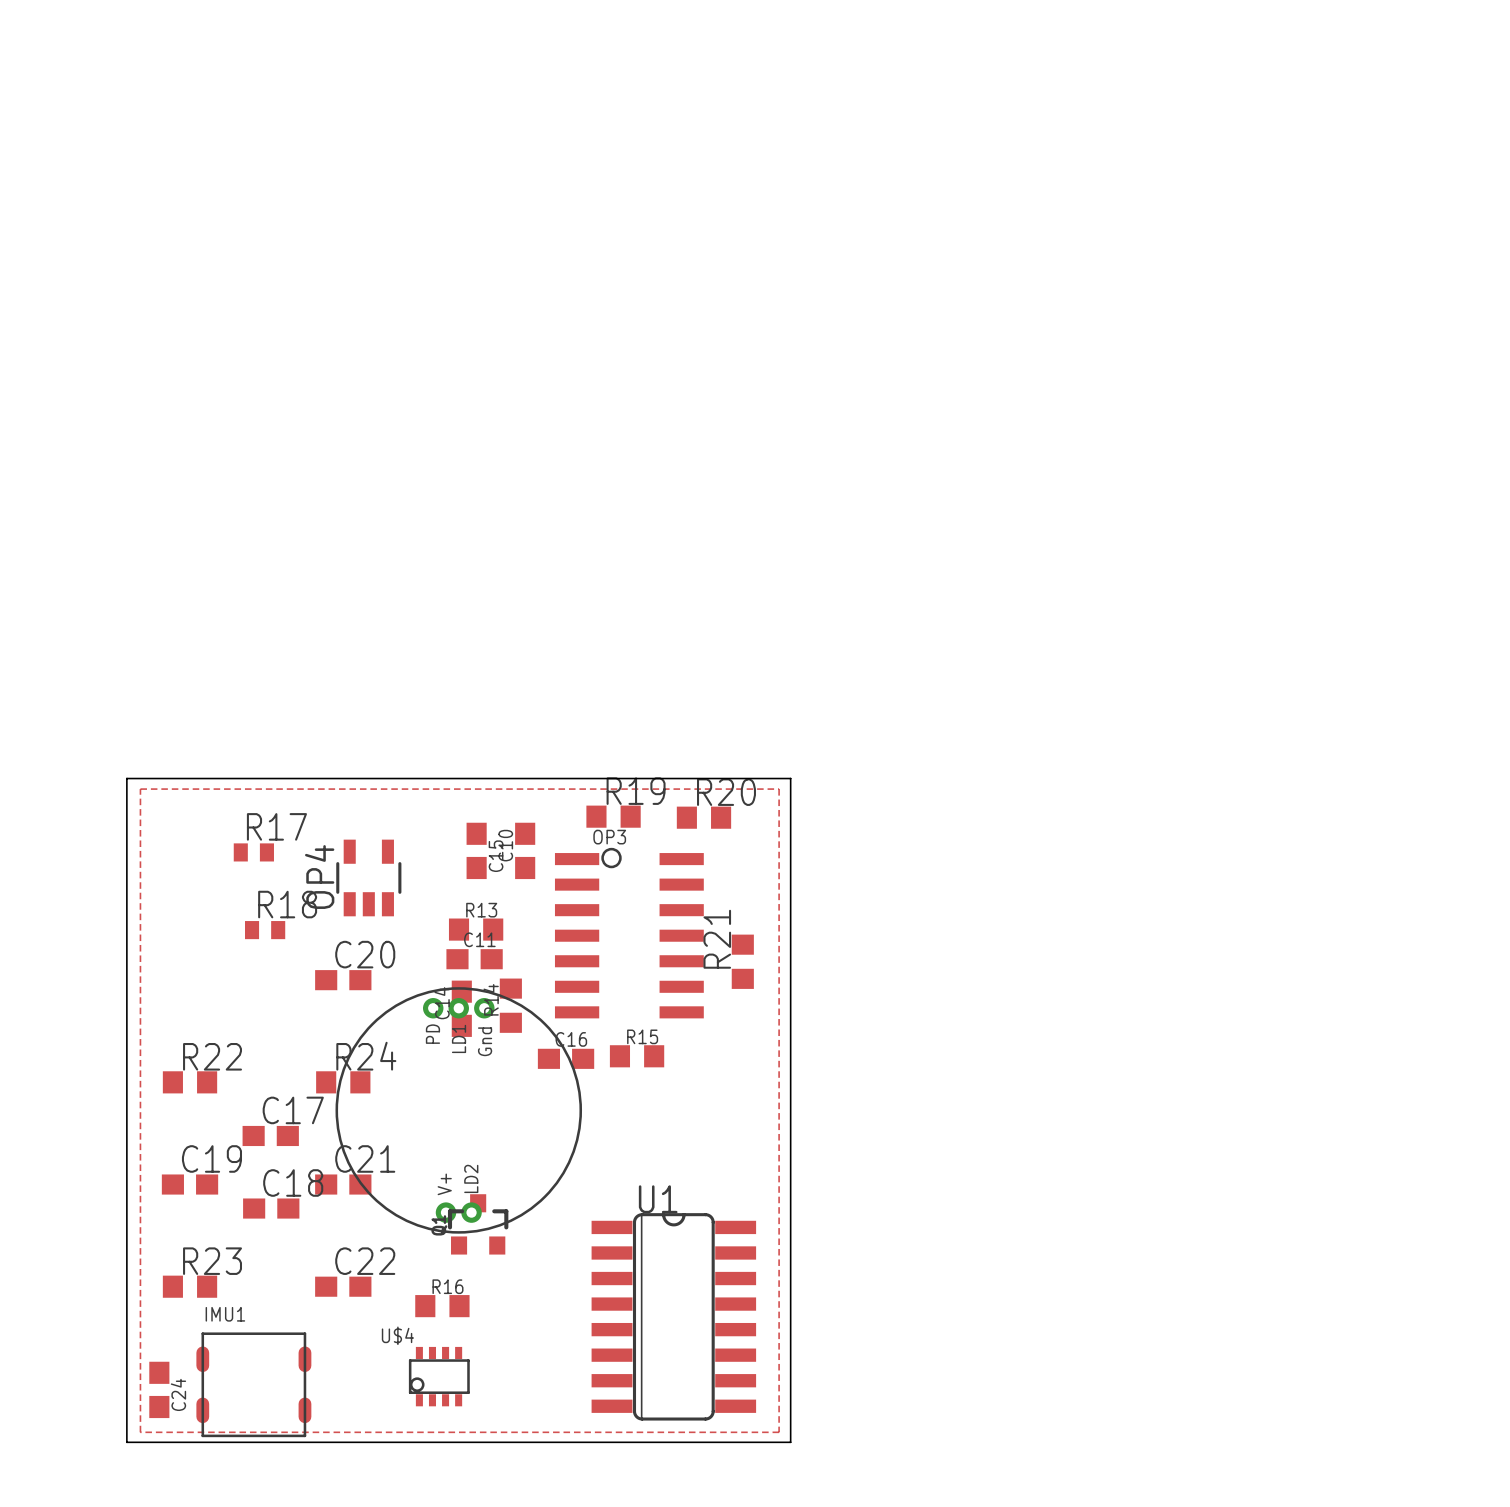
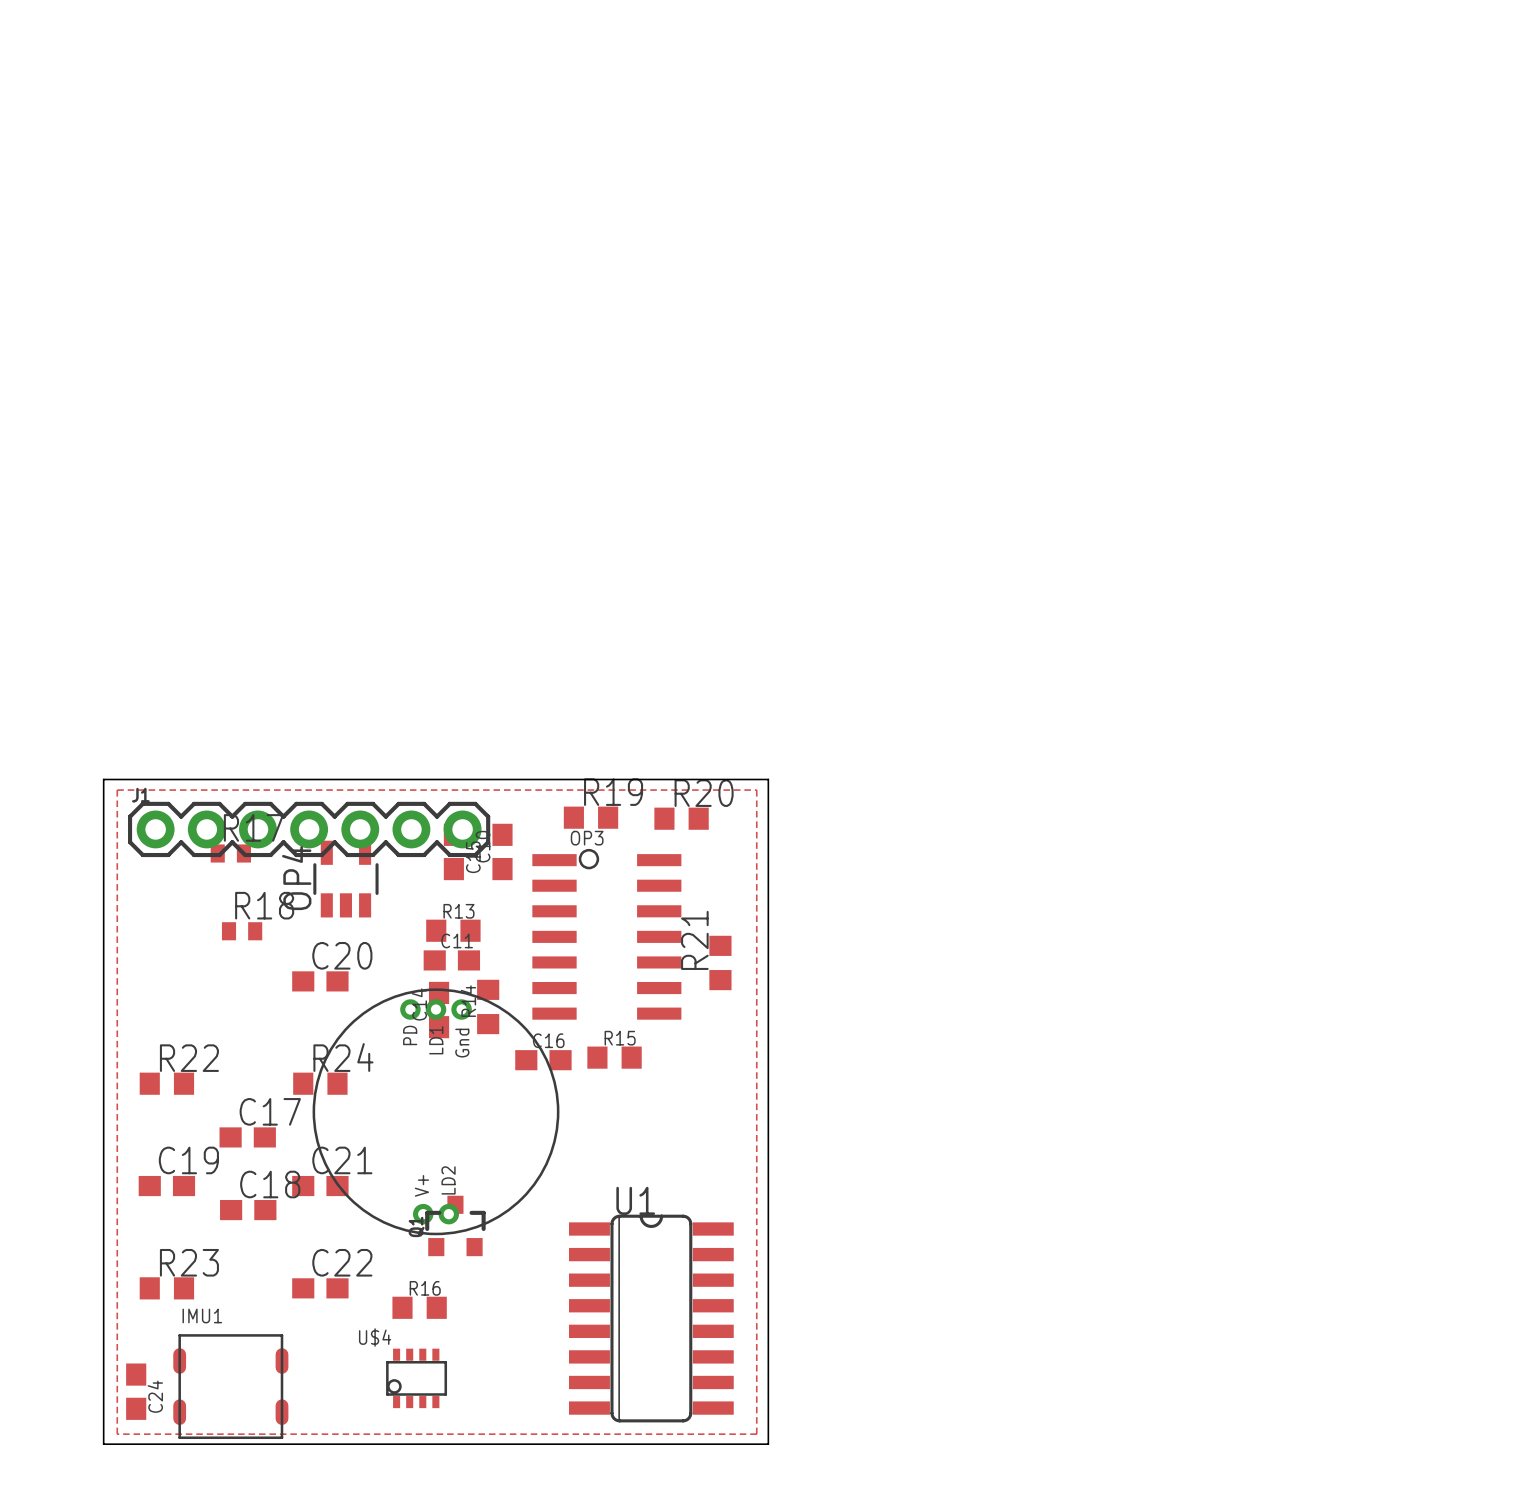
J1: none -> (309, 829)

